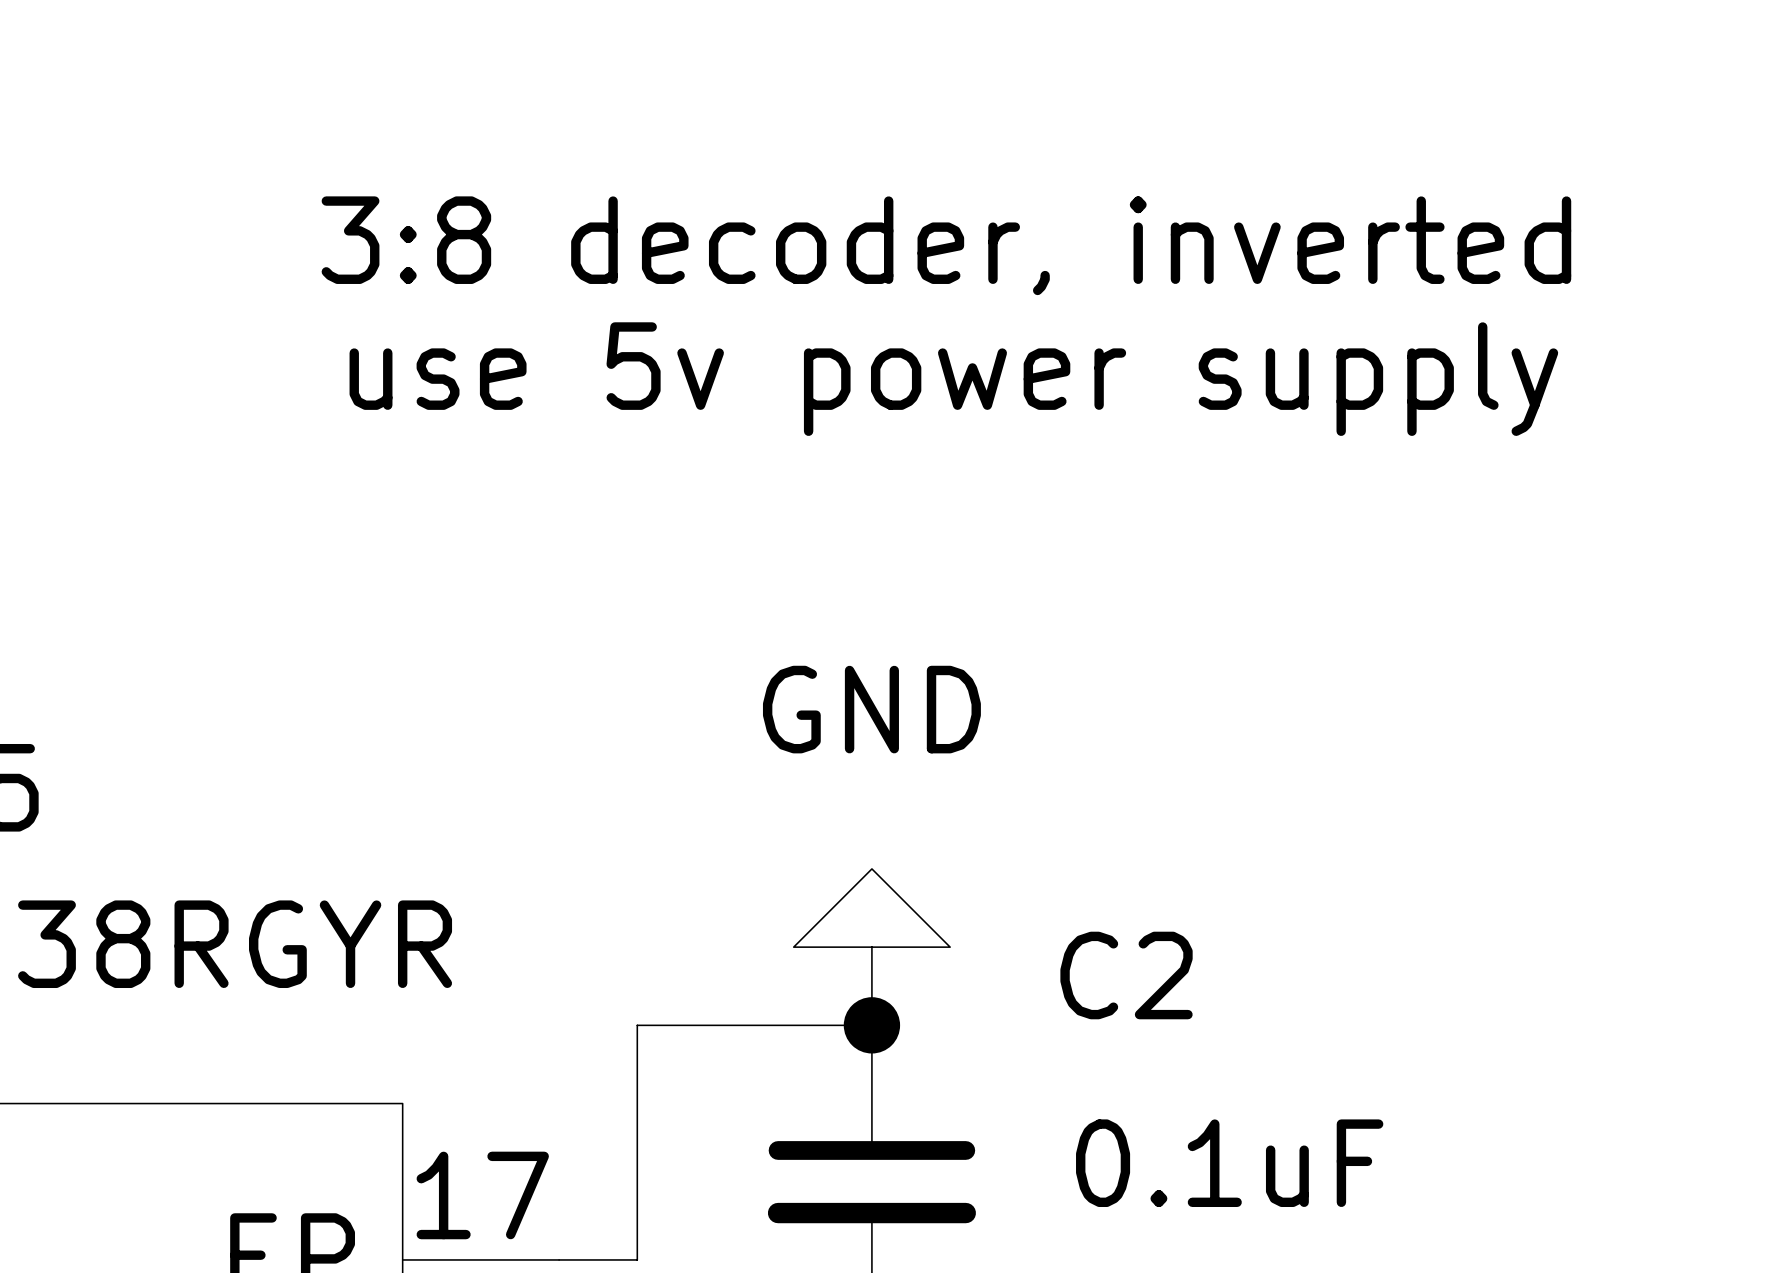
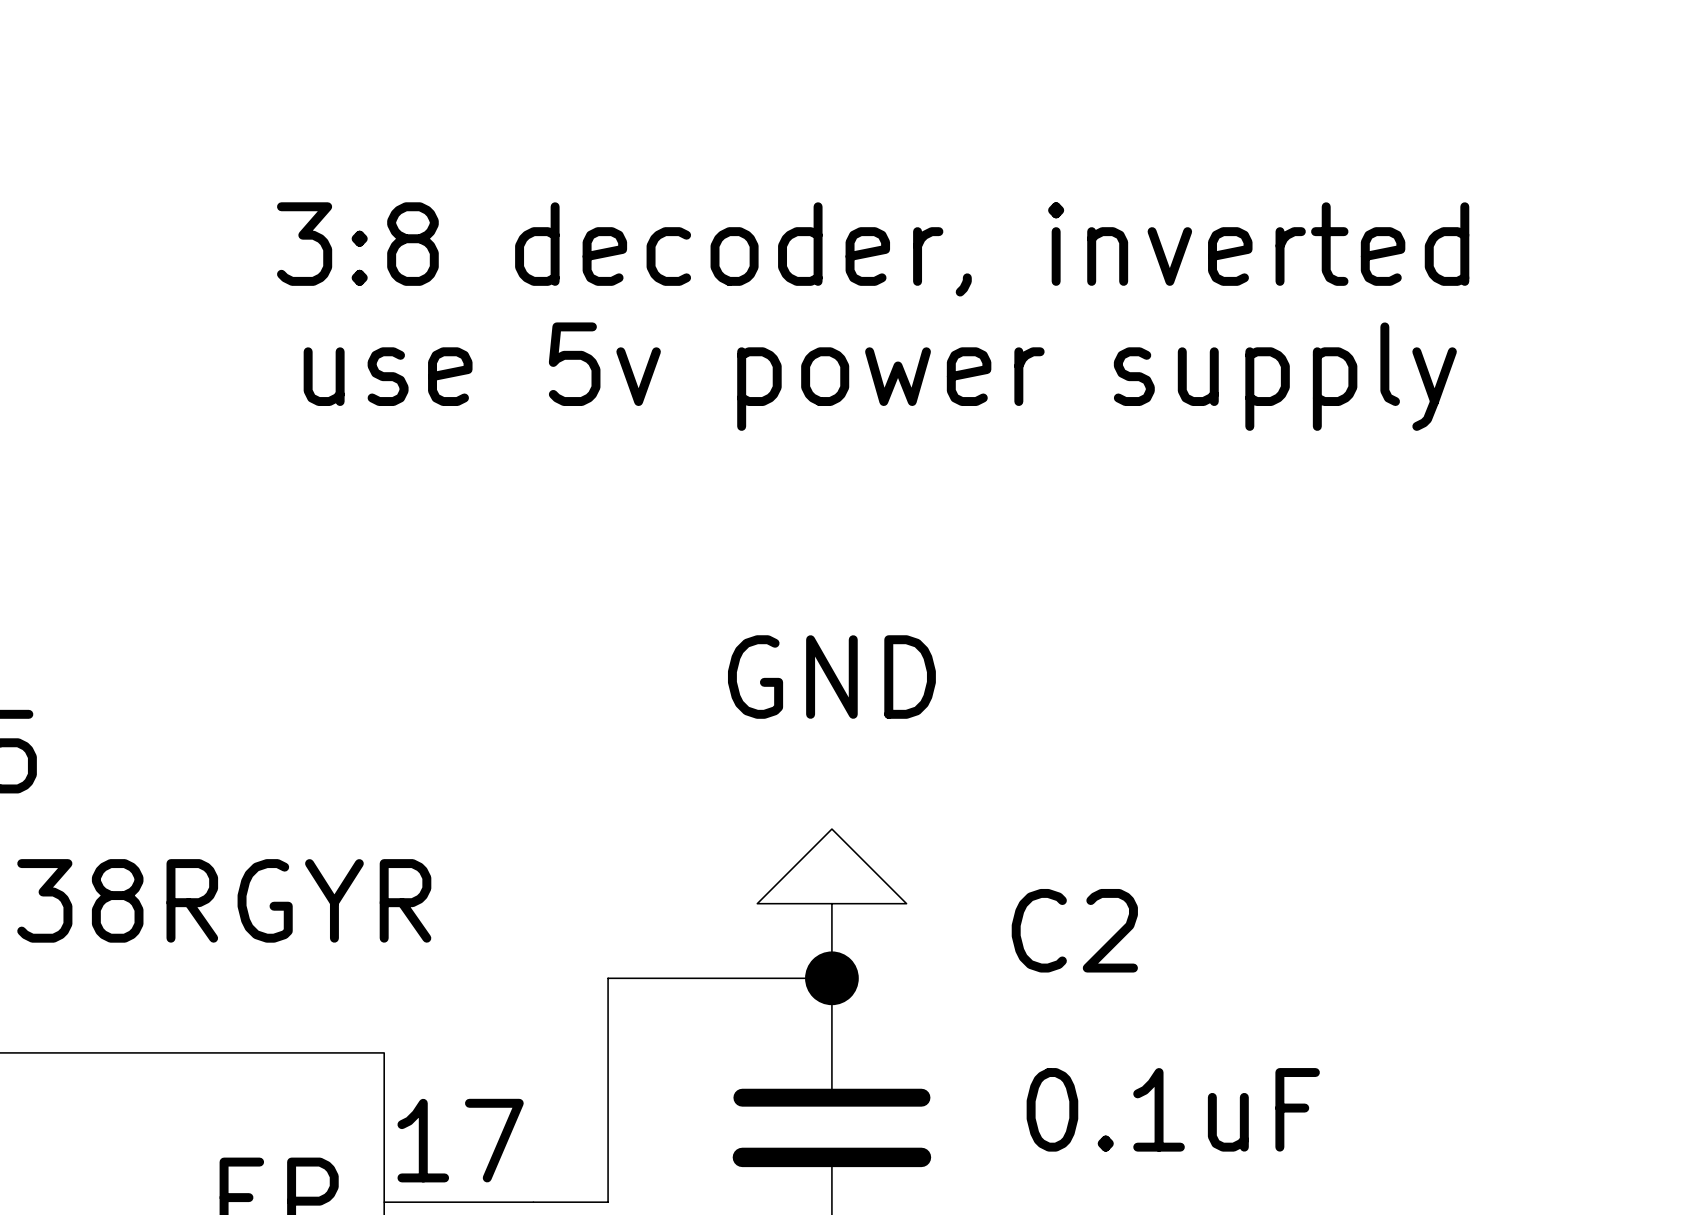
text position: 3:8 decoder, inverted (946, 245) -> 3:8 decoder, inverted (873, 249)
text position: use 5v power supply (953, 379) -> use 5v power supply (880, 376)

